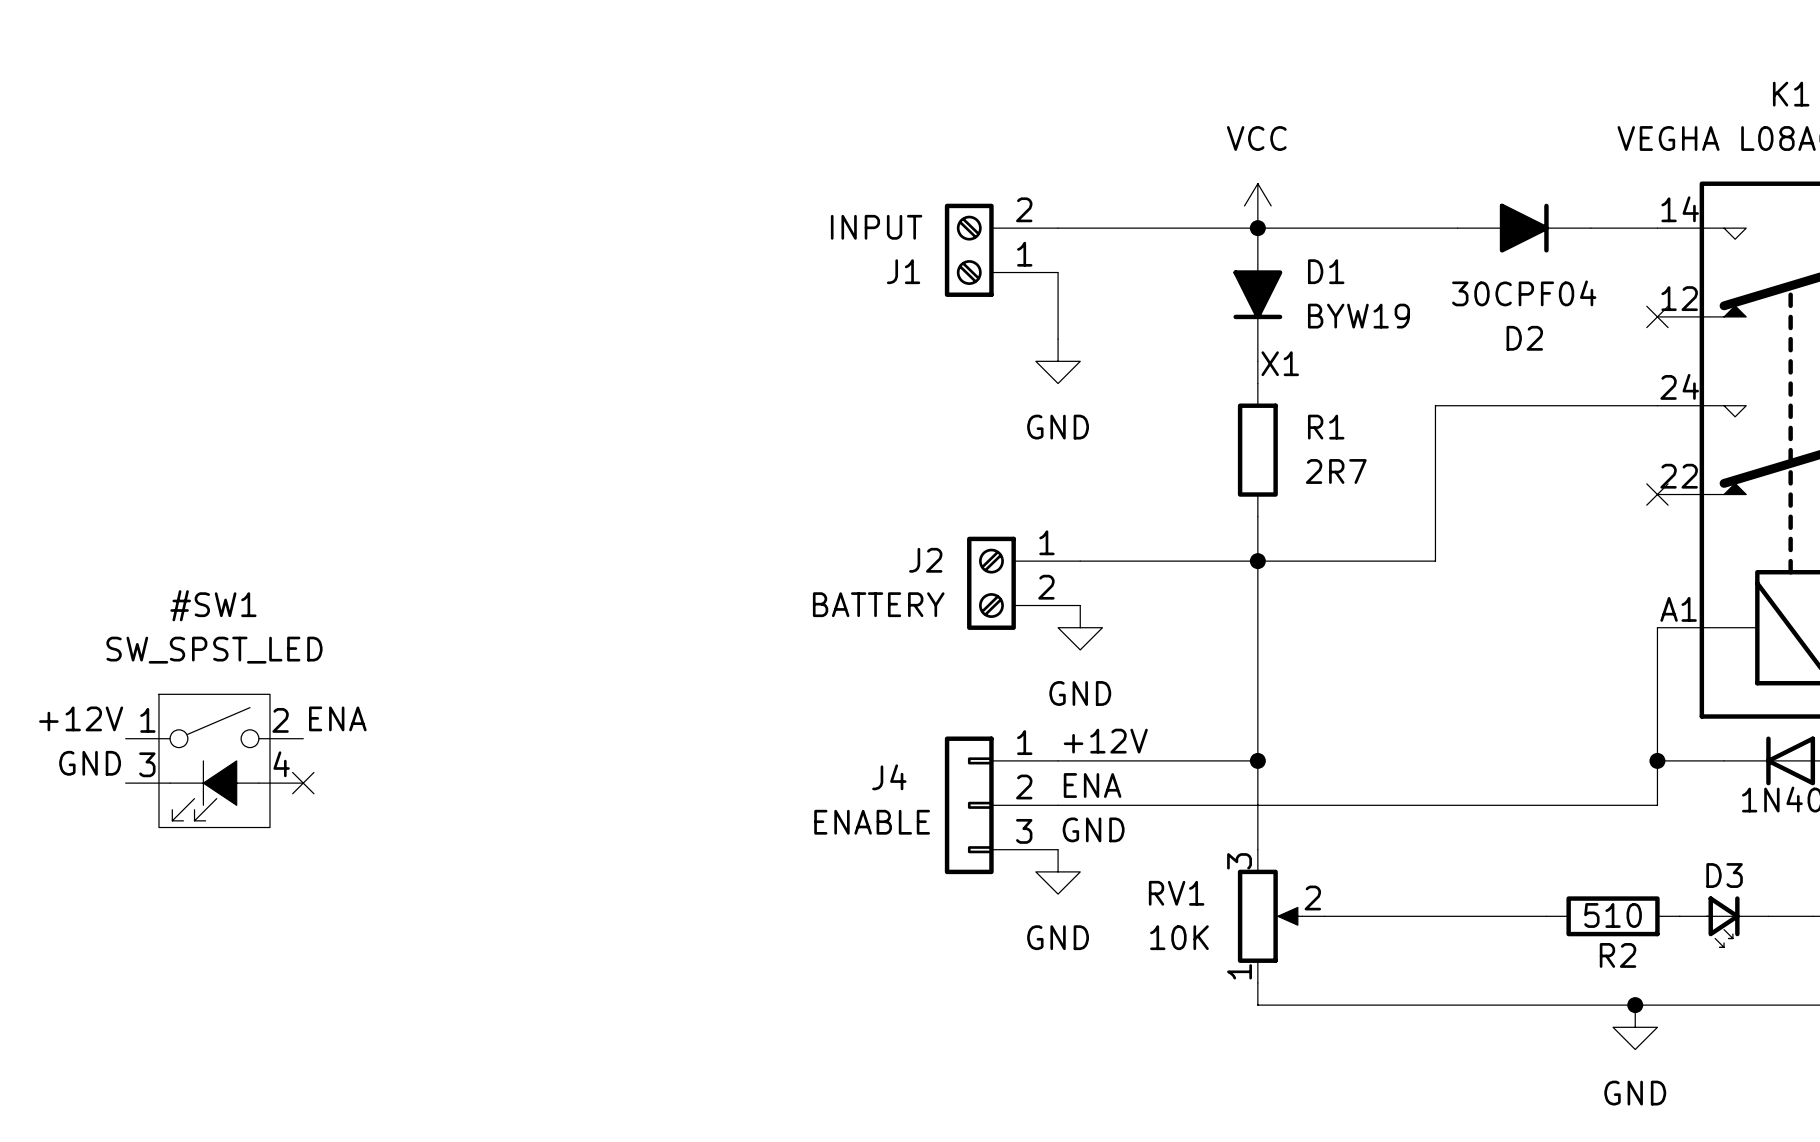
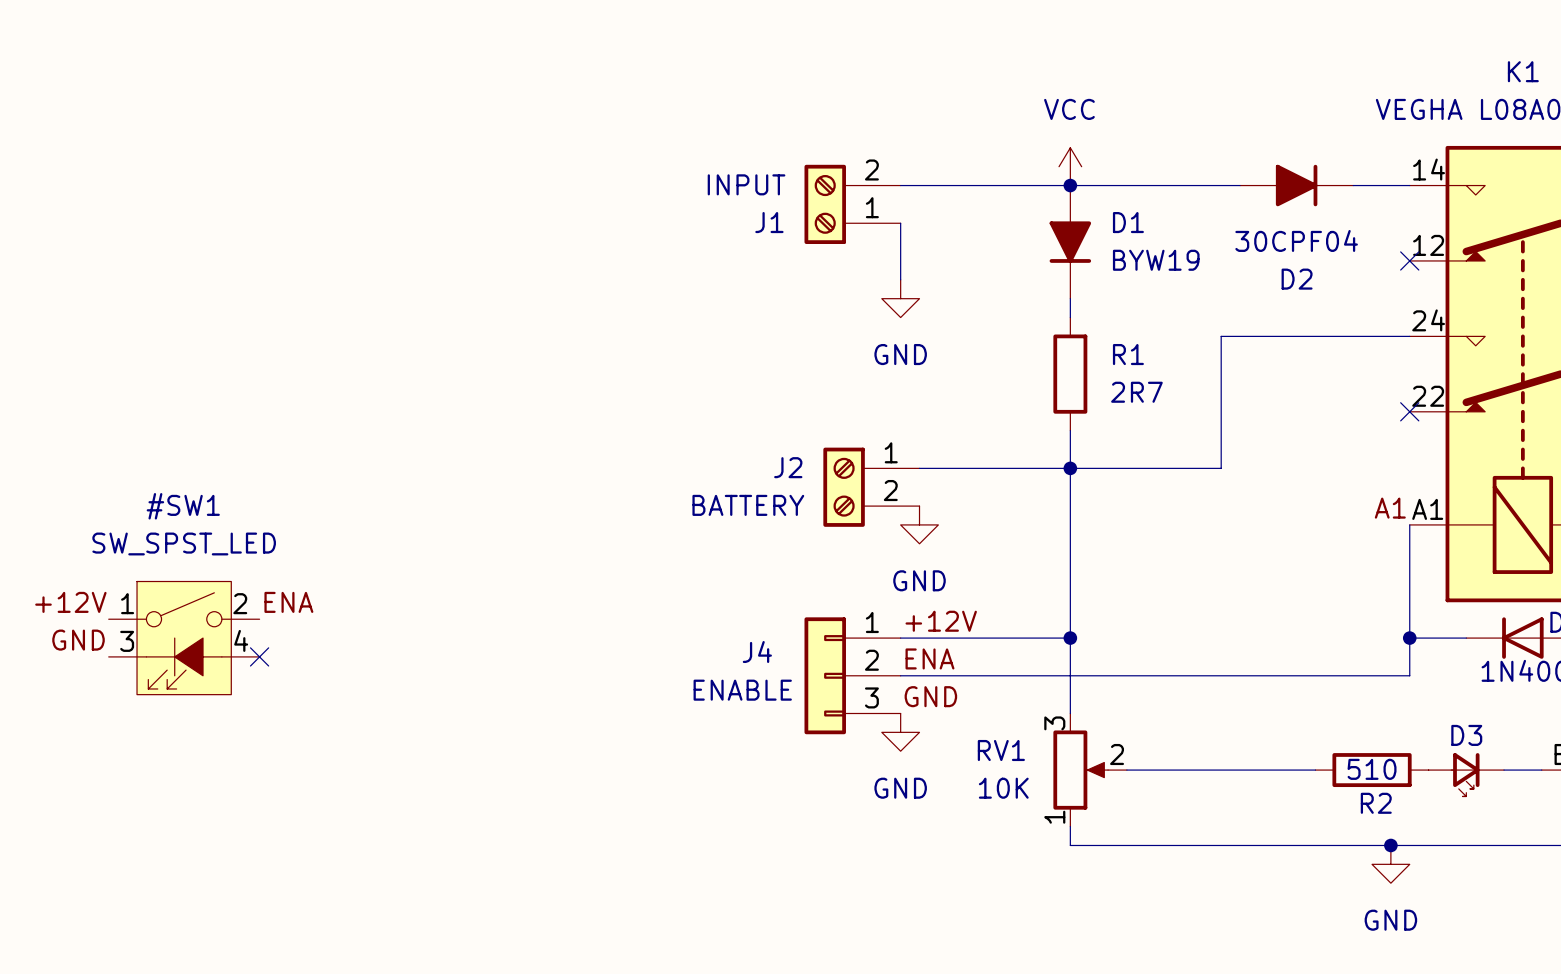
label: X1 (1280, 363) -> none
label: none -> A1 (1390, 508)

